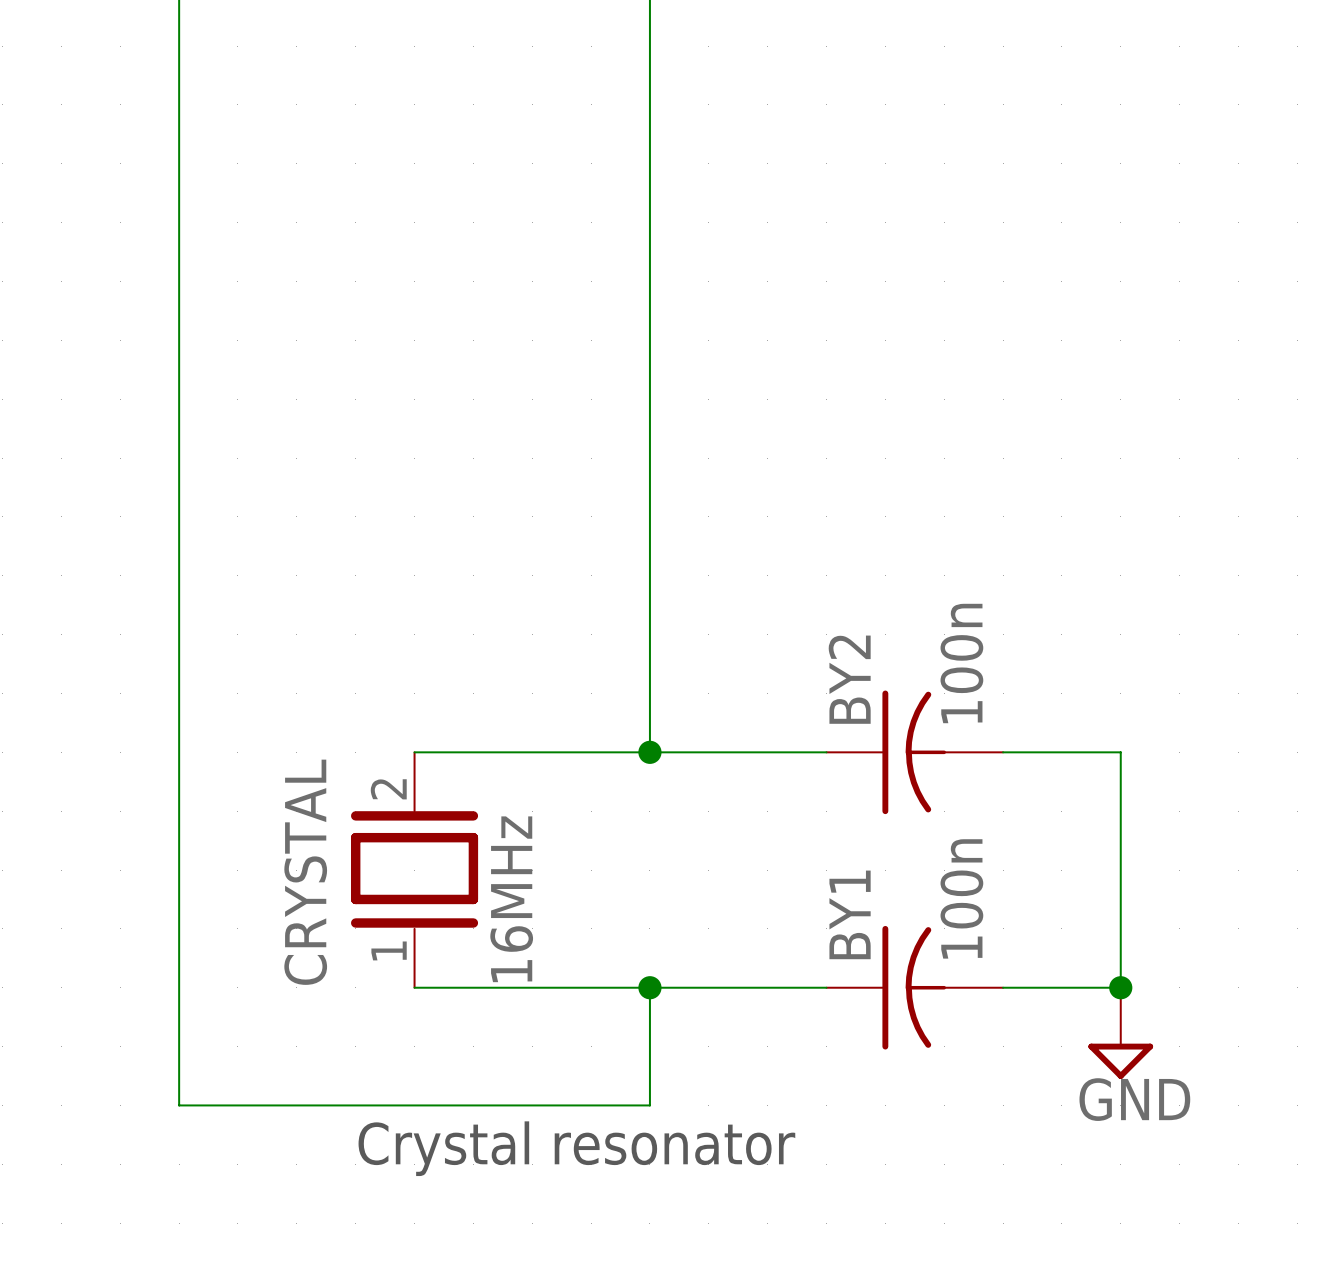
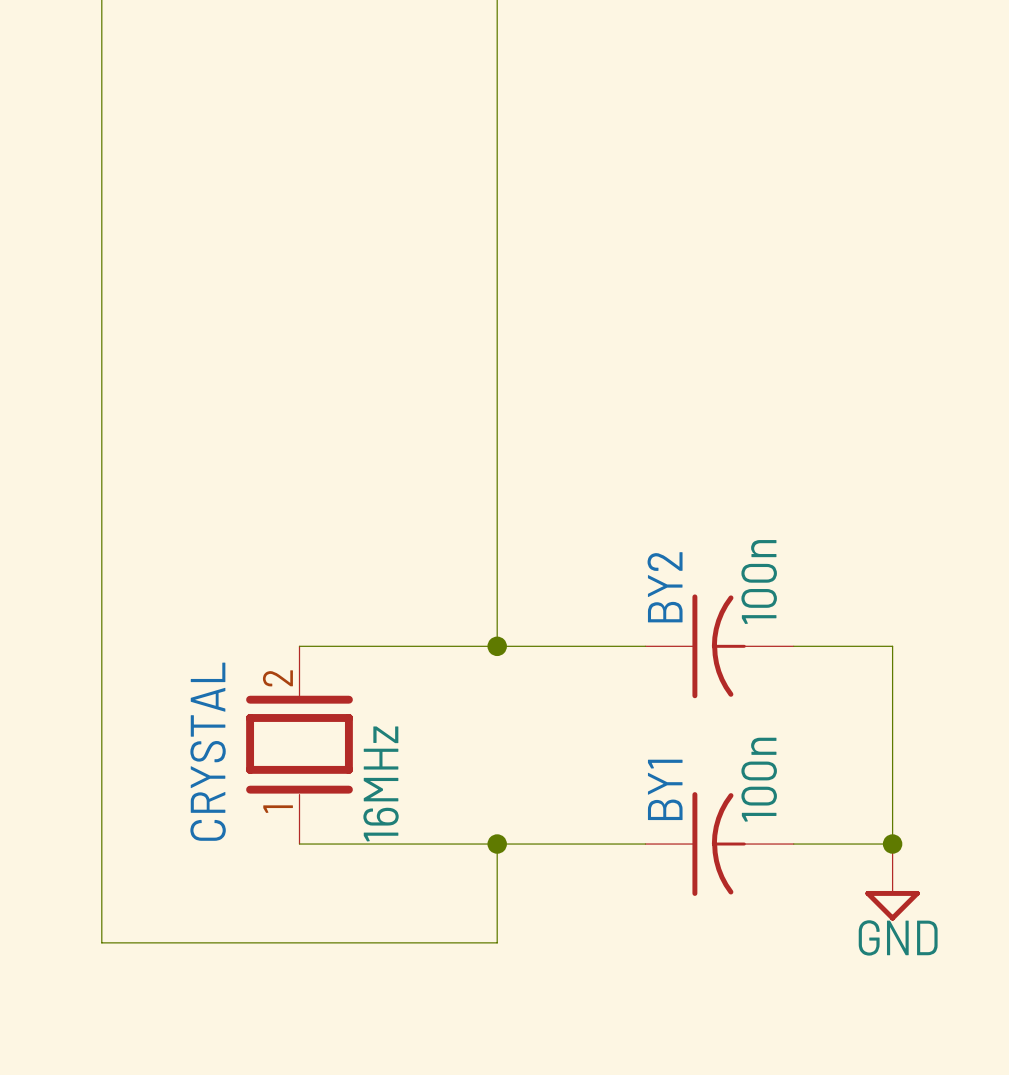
text: Crystal resonator (576, 1148) -> none

